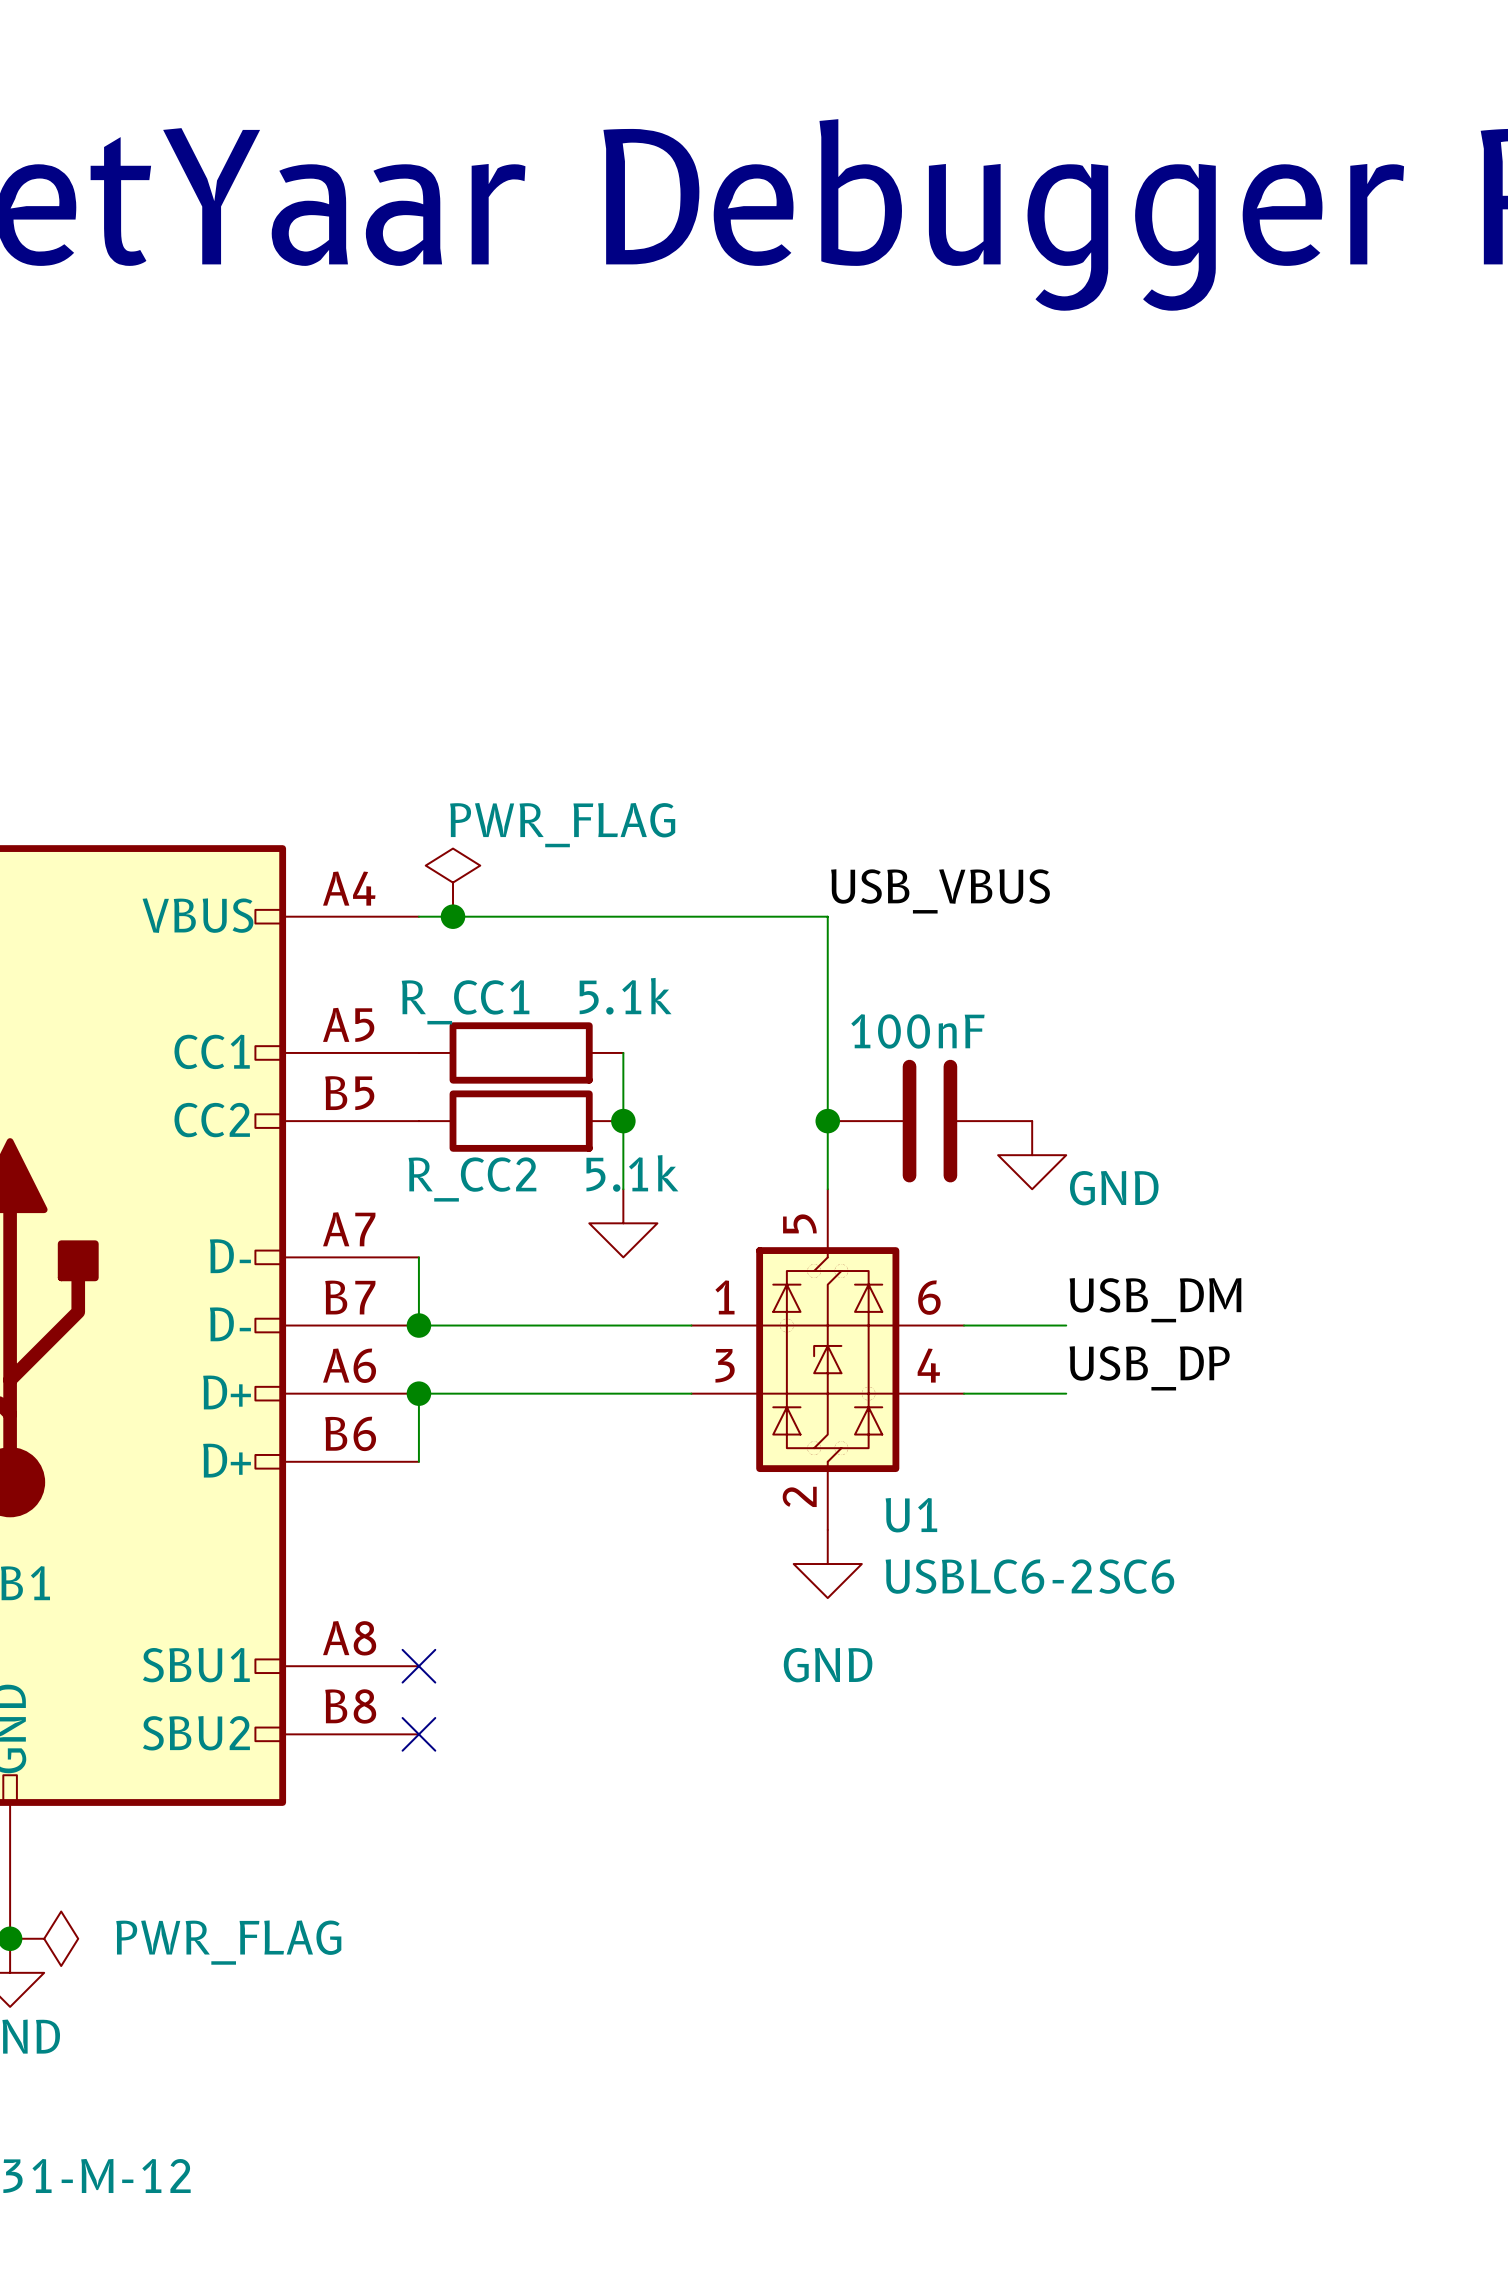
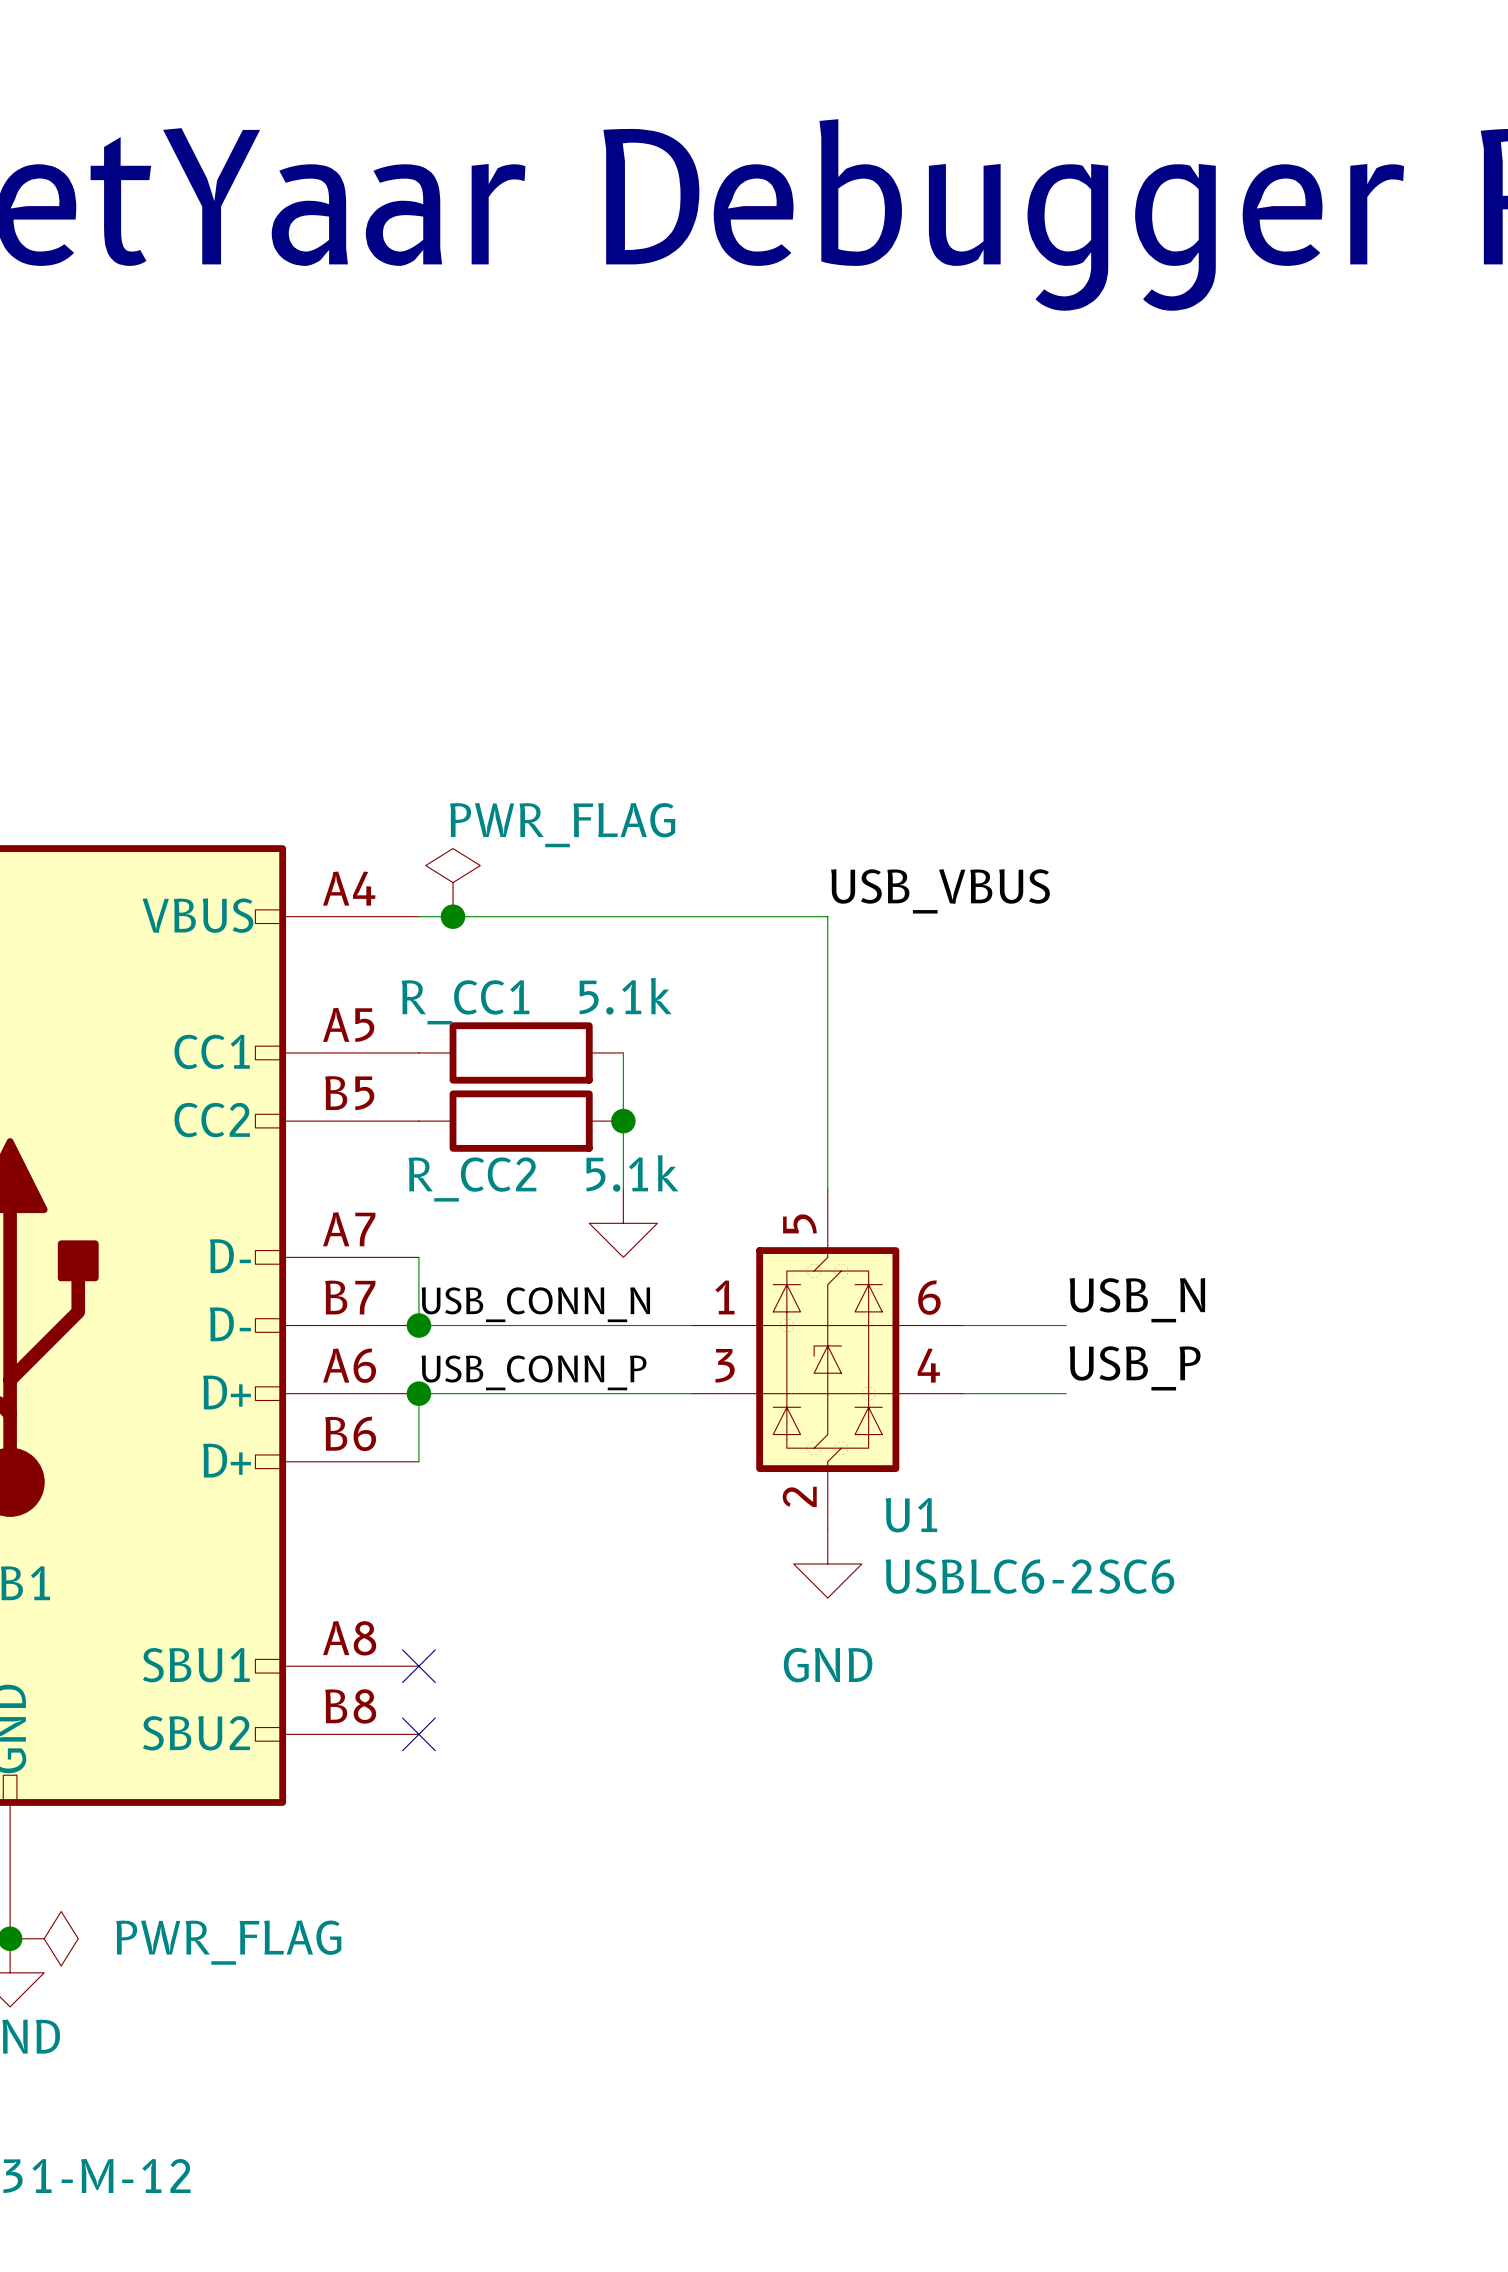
junction: (827, 1121) -> none
part: 100nF (929, 1121) -> none
power symbol: GND (1032, 1155) -> none
label: USB_DM (1155, 1300) -> USB_N (1137, 1300)
label: none -> USB_CONN_N (535, 1304)
label: USB_DP (1149, 1368) -> USB_P (1135, 1368)
label: none -> USB_CONN_P (534, 1372)

